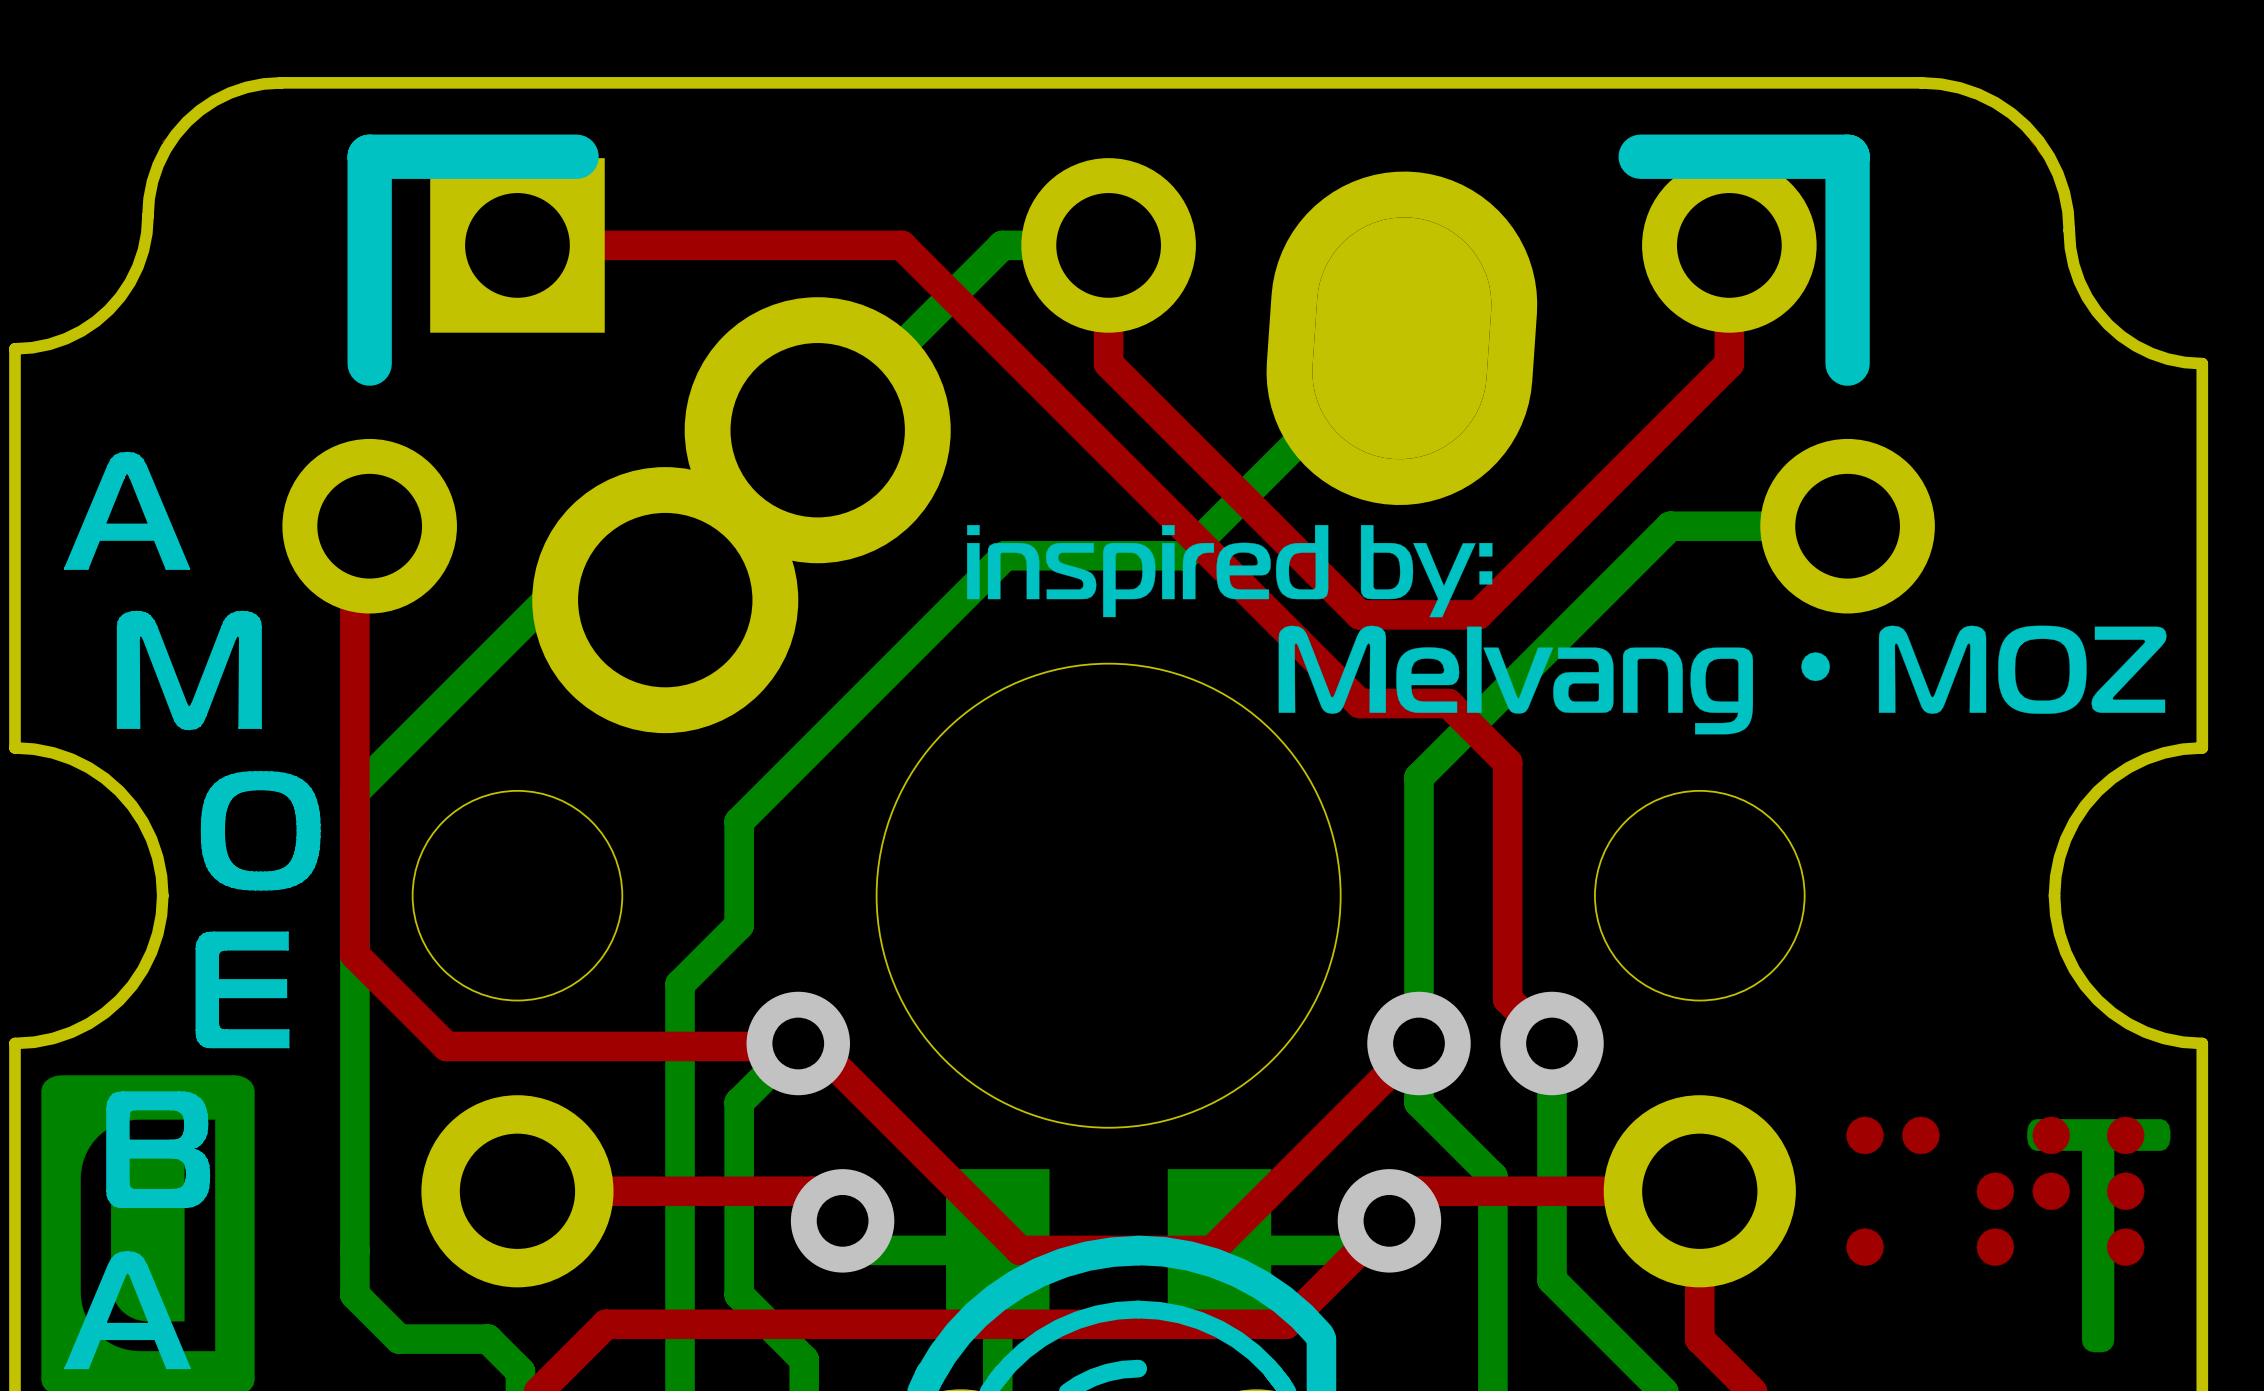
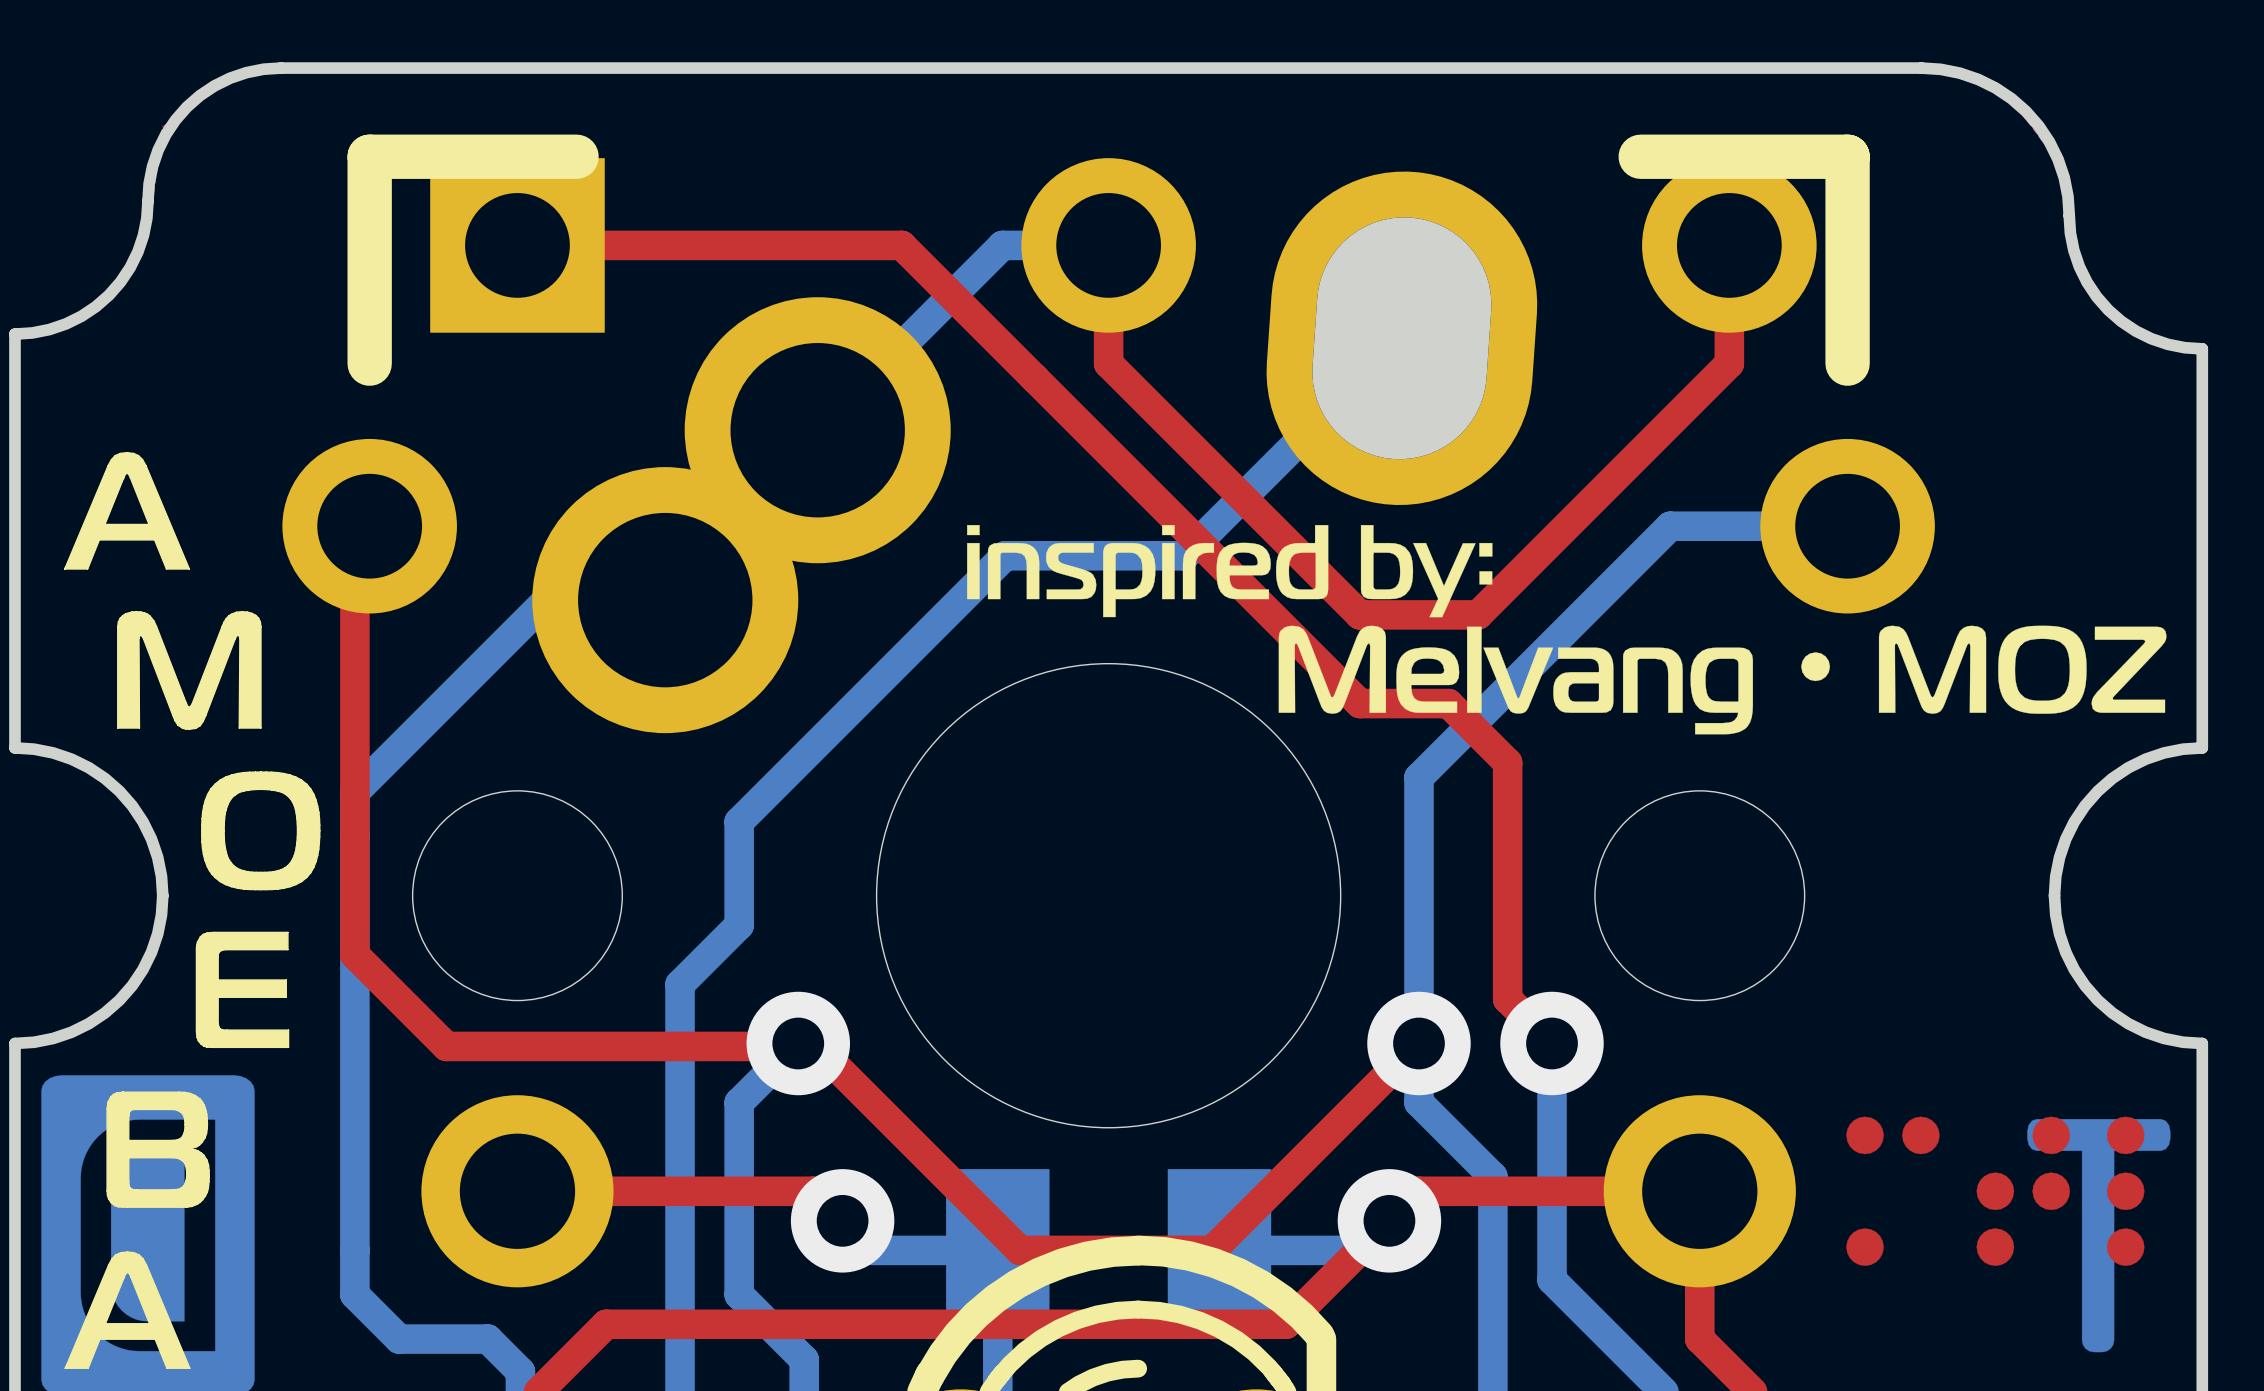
board edge: (14, 348) (49, 344) (65, 338) (81, 331) (109, 309) (130, 282) (137, 266) (146, 233) (149, 198) (152, 181) (165, 149) (175, 134) (186, 121) (214, 100) (246, 87) (263, 83) (1921, 82) (1940, 84) (1978, 94) (1995, 102) (2025, 126) (2038, 140) (2058, 174) (2068, 211) (2070, 248) (2073, 265) (2087, 297) (2096, 311) (2108, 324) (2135, 345) (2167, 359) (2202, 363) -> (14, 348) (14, 334) (49, 329) (65, 323) (81, 316) (109, 295) (130, 267) (137, 251) (146, 218) (149, 183) (152, 166) (165, 134) (175, 120) (186, 107) (214, 85) (246, 72) (263, 69) (1921, 68) (1940, 69) (1978, 79) (1995, 87) (2025, 111) (2038, 125) (2058, 159) (2068, 196) (2070, 233) (2073, 250) (2087, 282) (2096, 296) (2108, 309) (2135, 331) (2167, 344) (2202, 348) (2202, 363)

